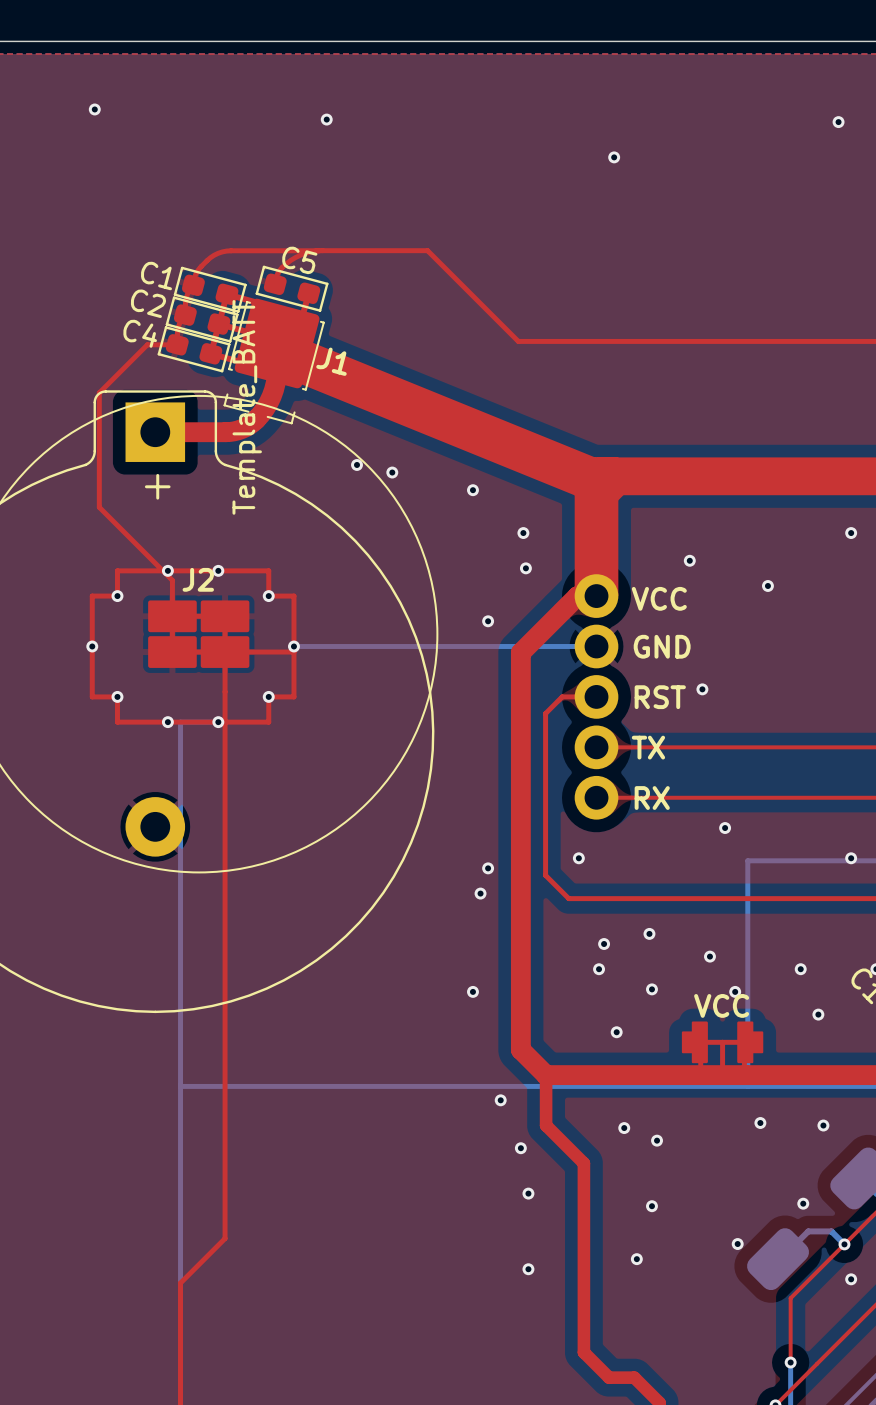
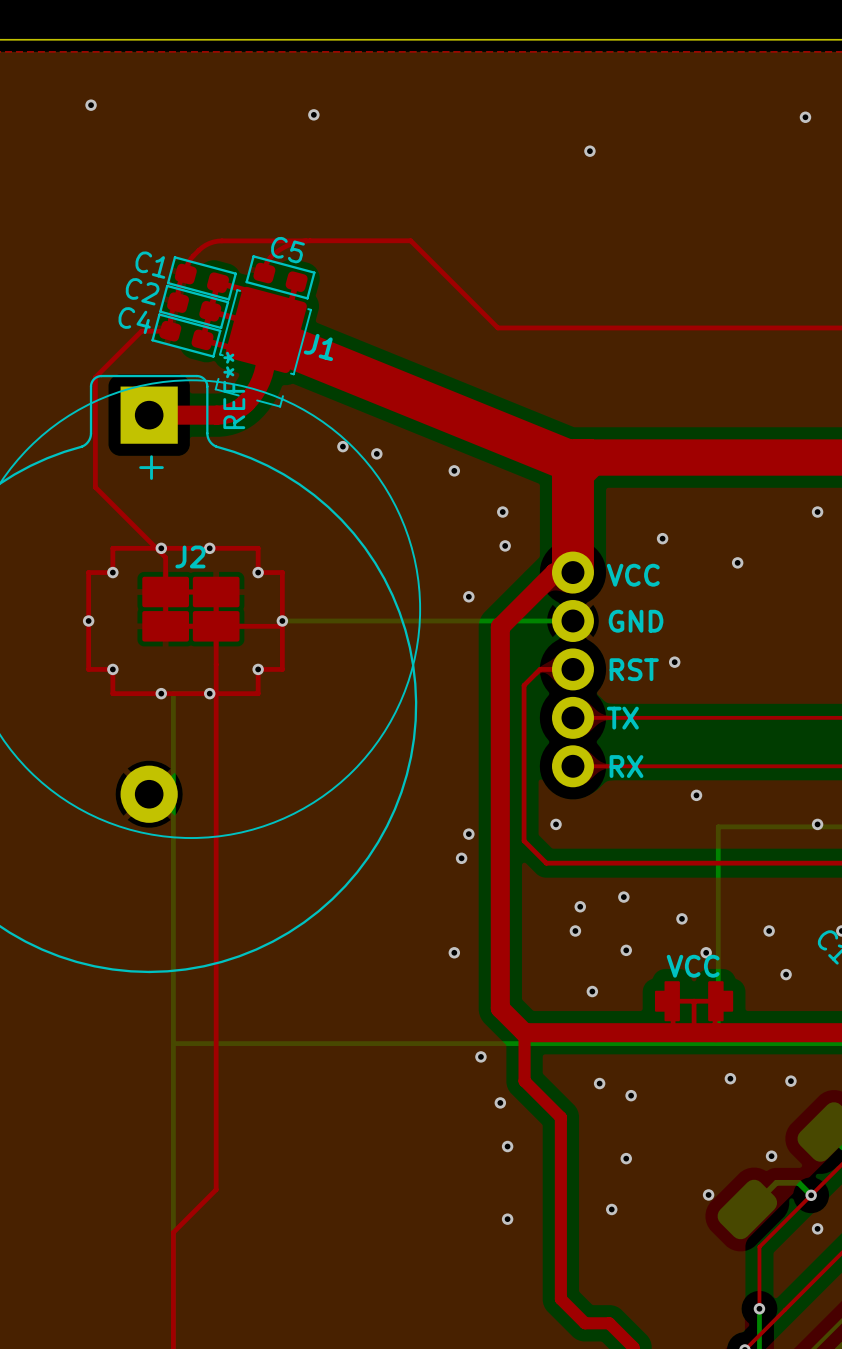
Template_BATT name: Template_BATT (247, 407) -> REF** (234, 390)

